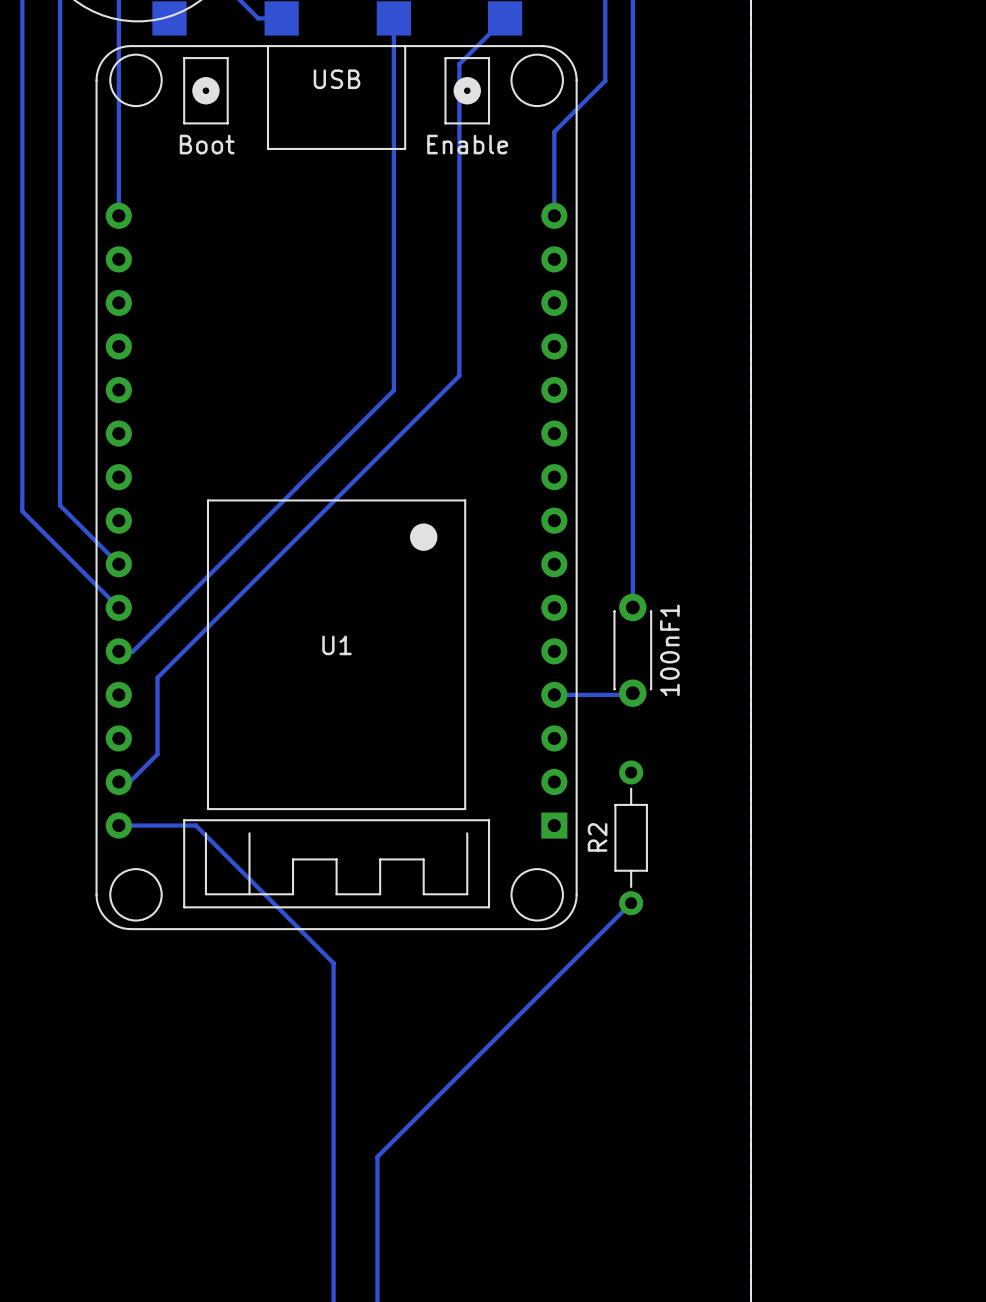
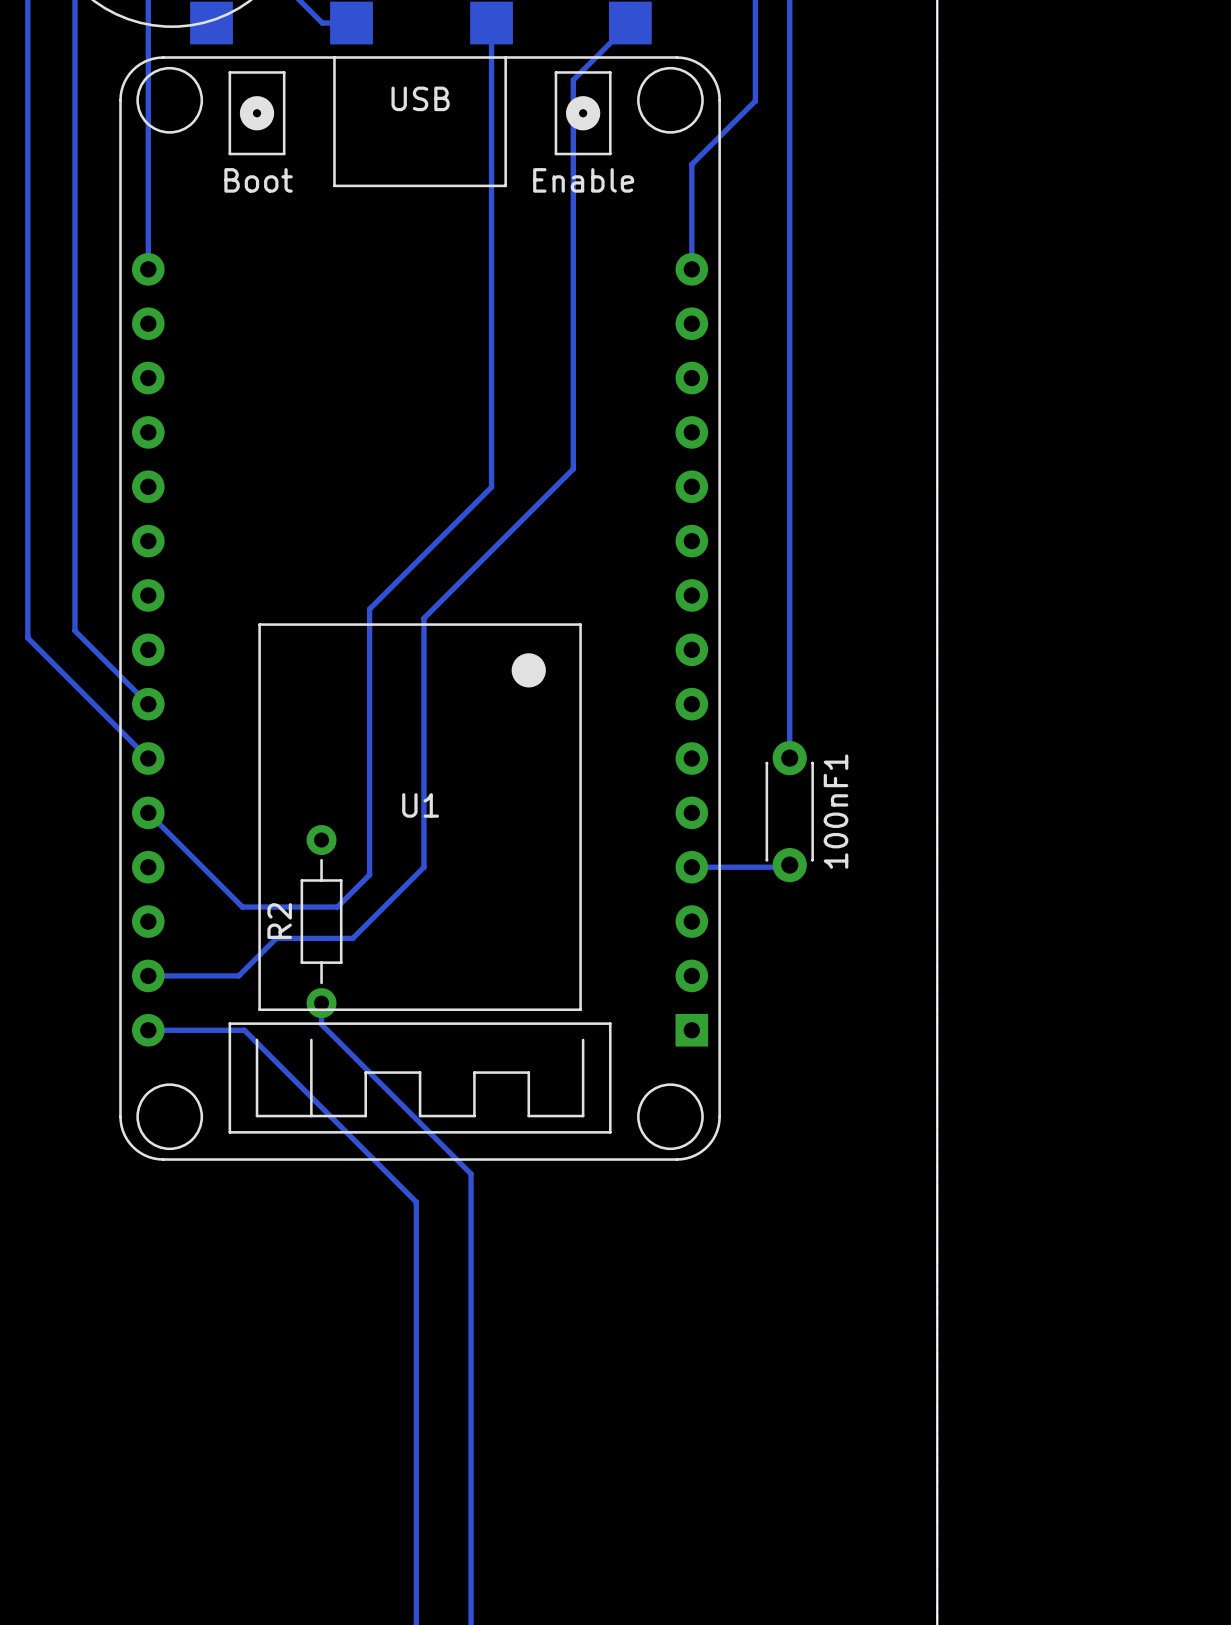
bottom track: (296, 488) (132, 651) (119, 651) -> (369, 609) (369, 874) (337, 907) (242, 907) (148, 813)
bottom track: (339, 495) (157, 677) (157, 754) (129, 782) -> (423, 618) (423, 867) (352, 938) (276, 938) (238, 975) (161, 975)
R2 position: (631, 837) -> (321, 921)
bottom track: (631, 902) (377, 1156) -> (321, 1003) (321, 1024) (471, 1173) (471, 1443)

